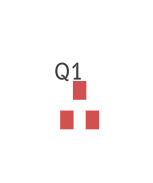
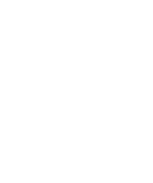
Q1: (79, 105) -> none

